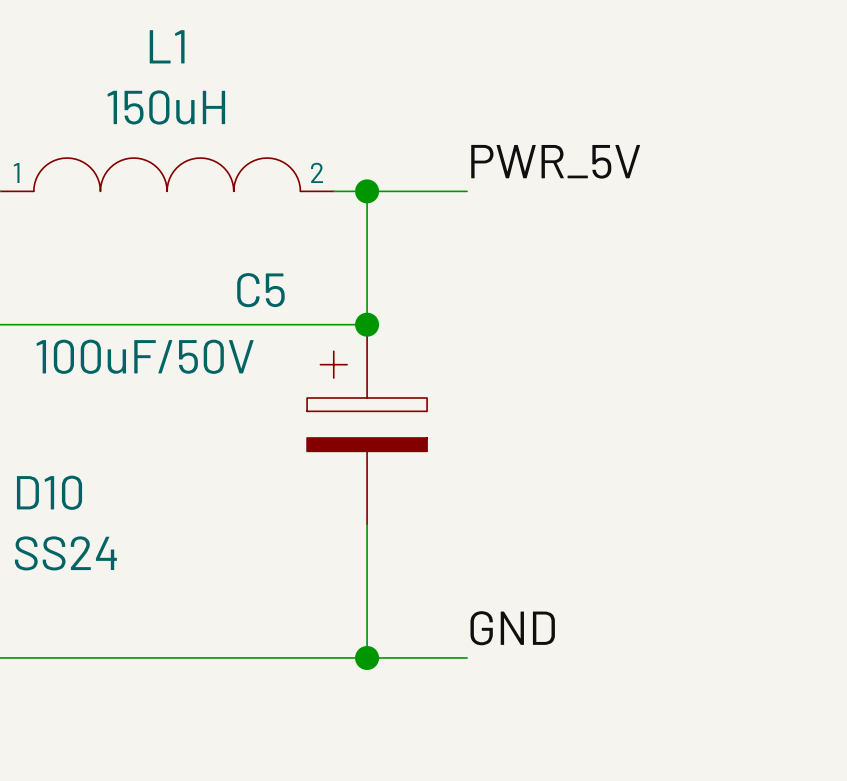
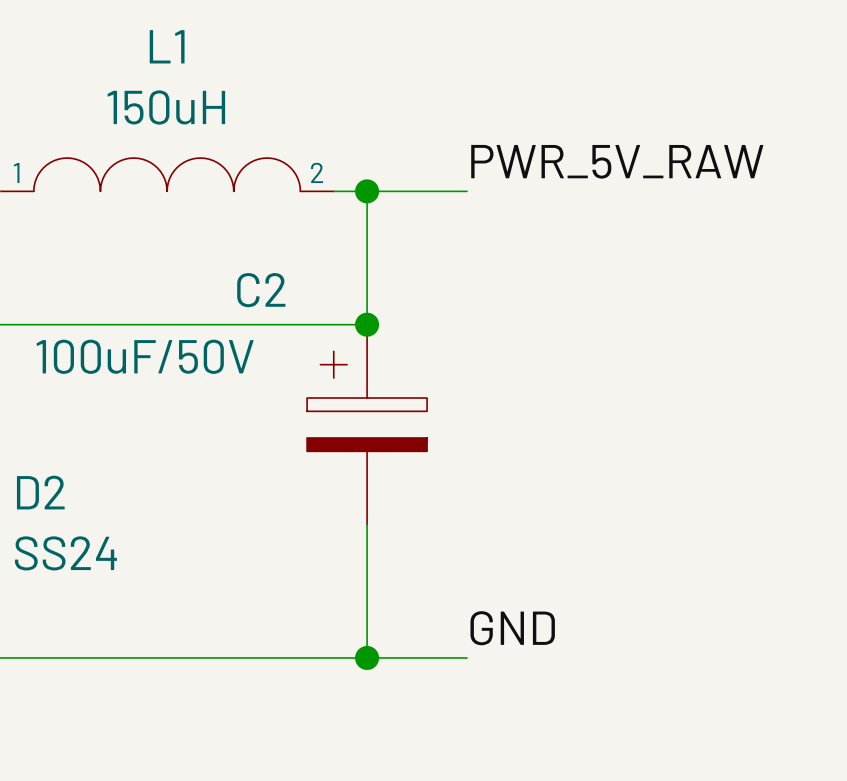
label: PWR_5V (555, 161) -> PWR_5V_RAW (617, 161)
C5 name: C5 (260, 290) -> C2 (261, 290)
D10 name: D10 (49, 492) -> D2 (40, 492)

